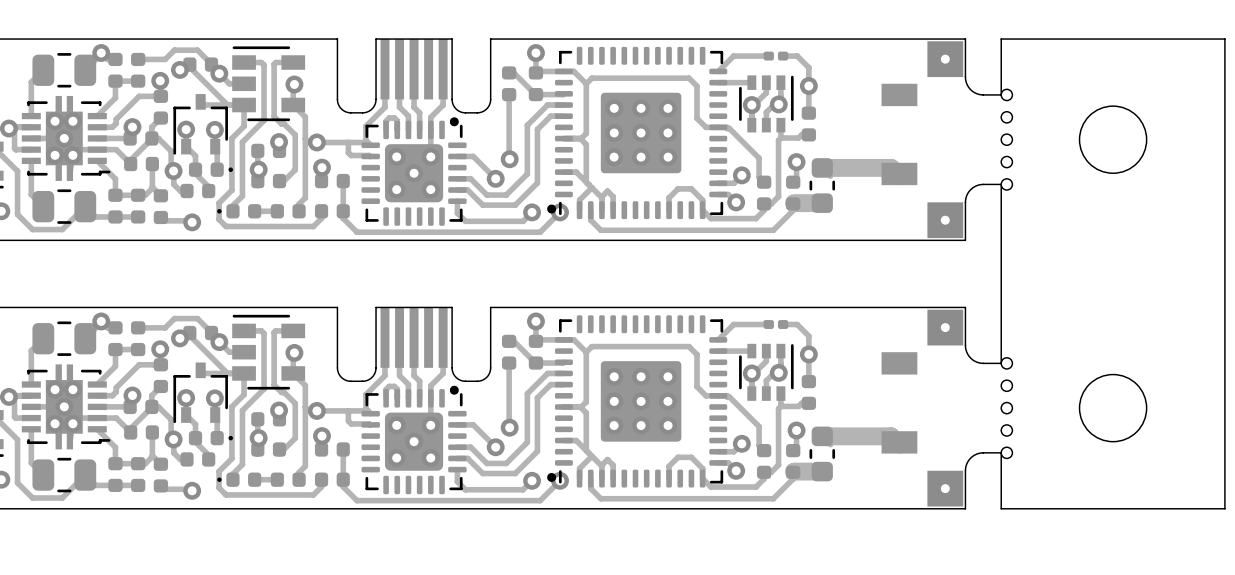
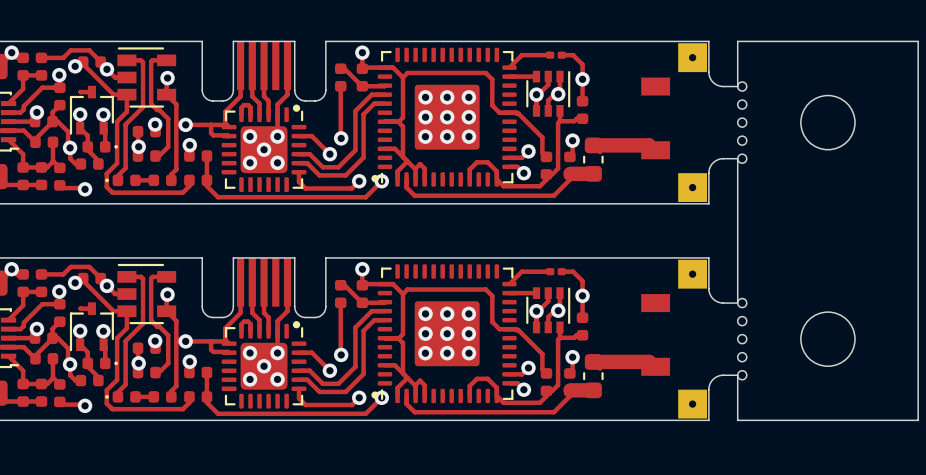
track: (200, 101) (203, 105) (227, 105) -> (91, 92) (80, 91)
track: (200, 370) (203, 373) (227, 373) -> (91, 308) (80, 308)

